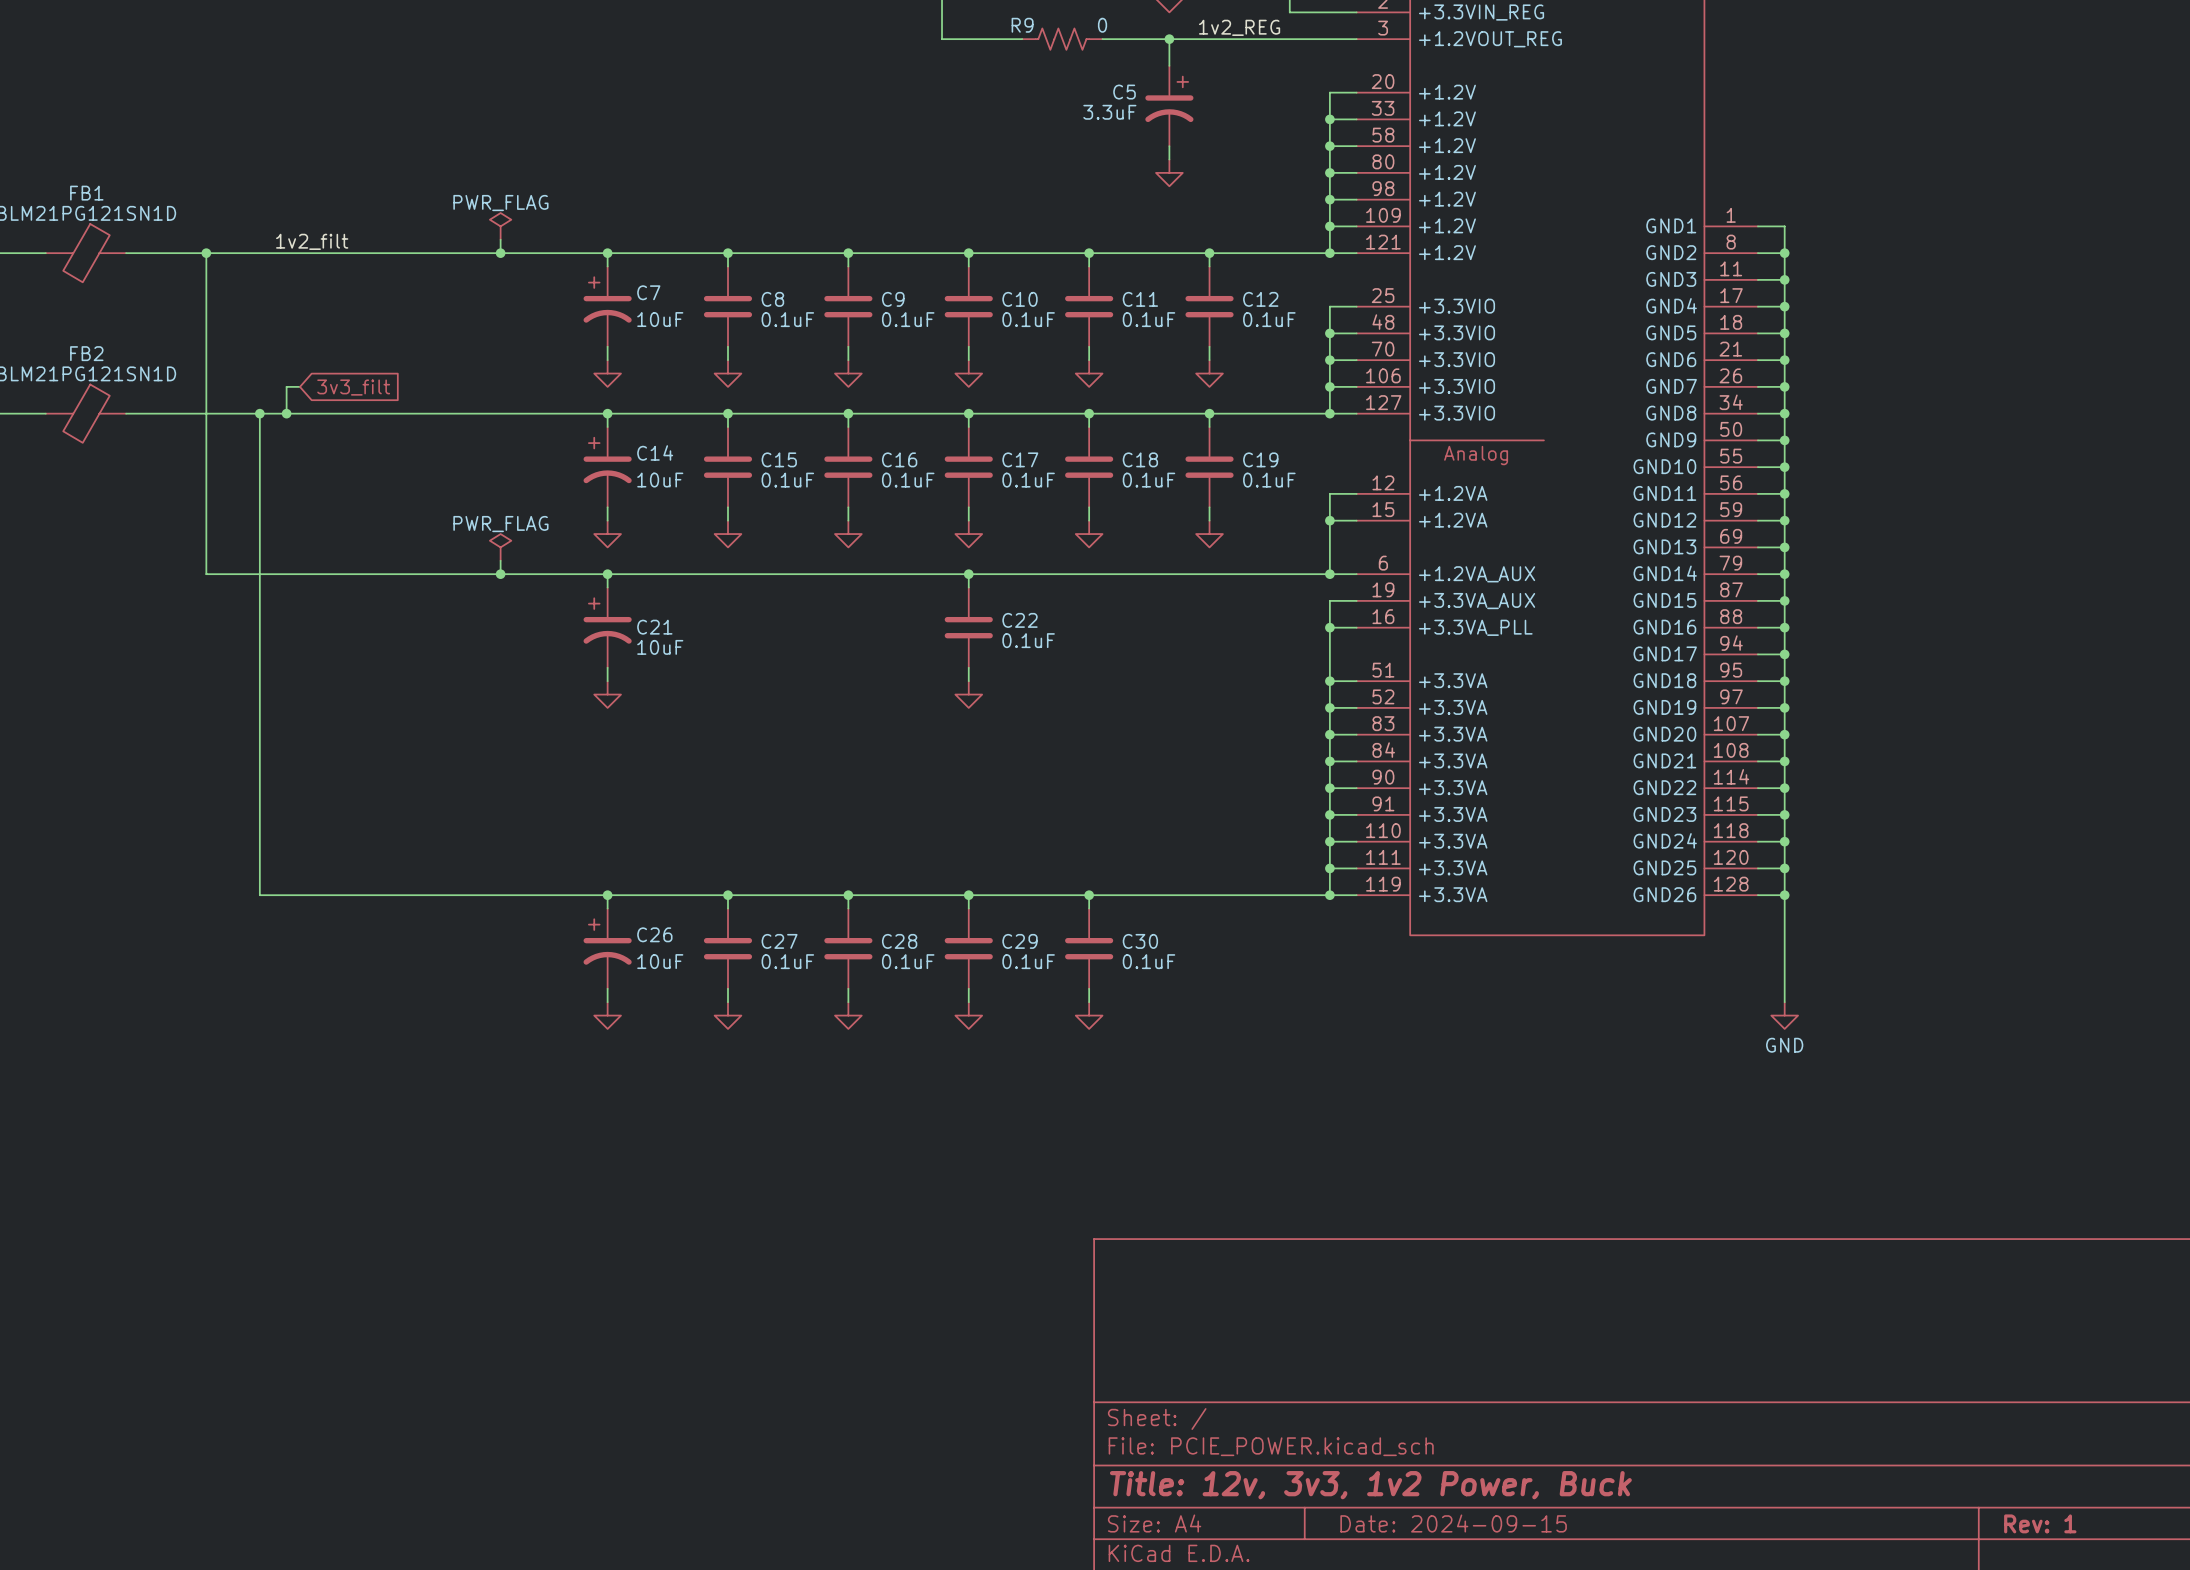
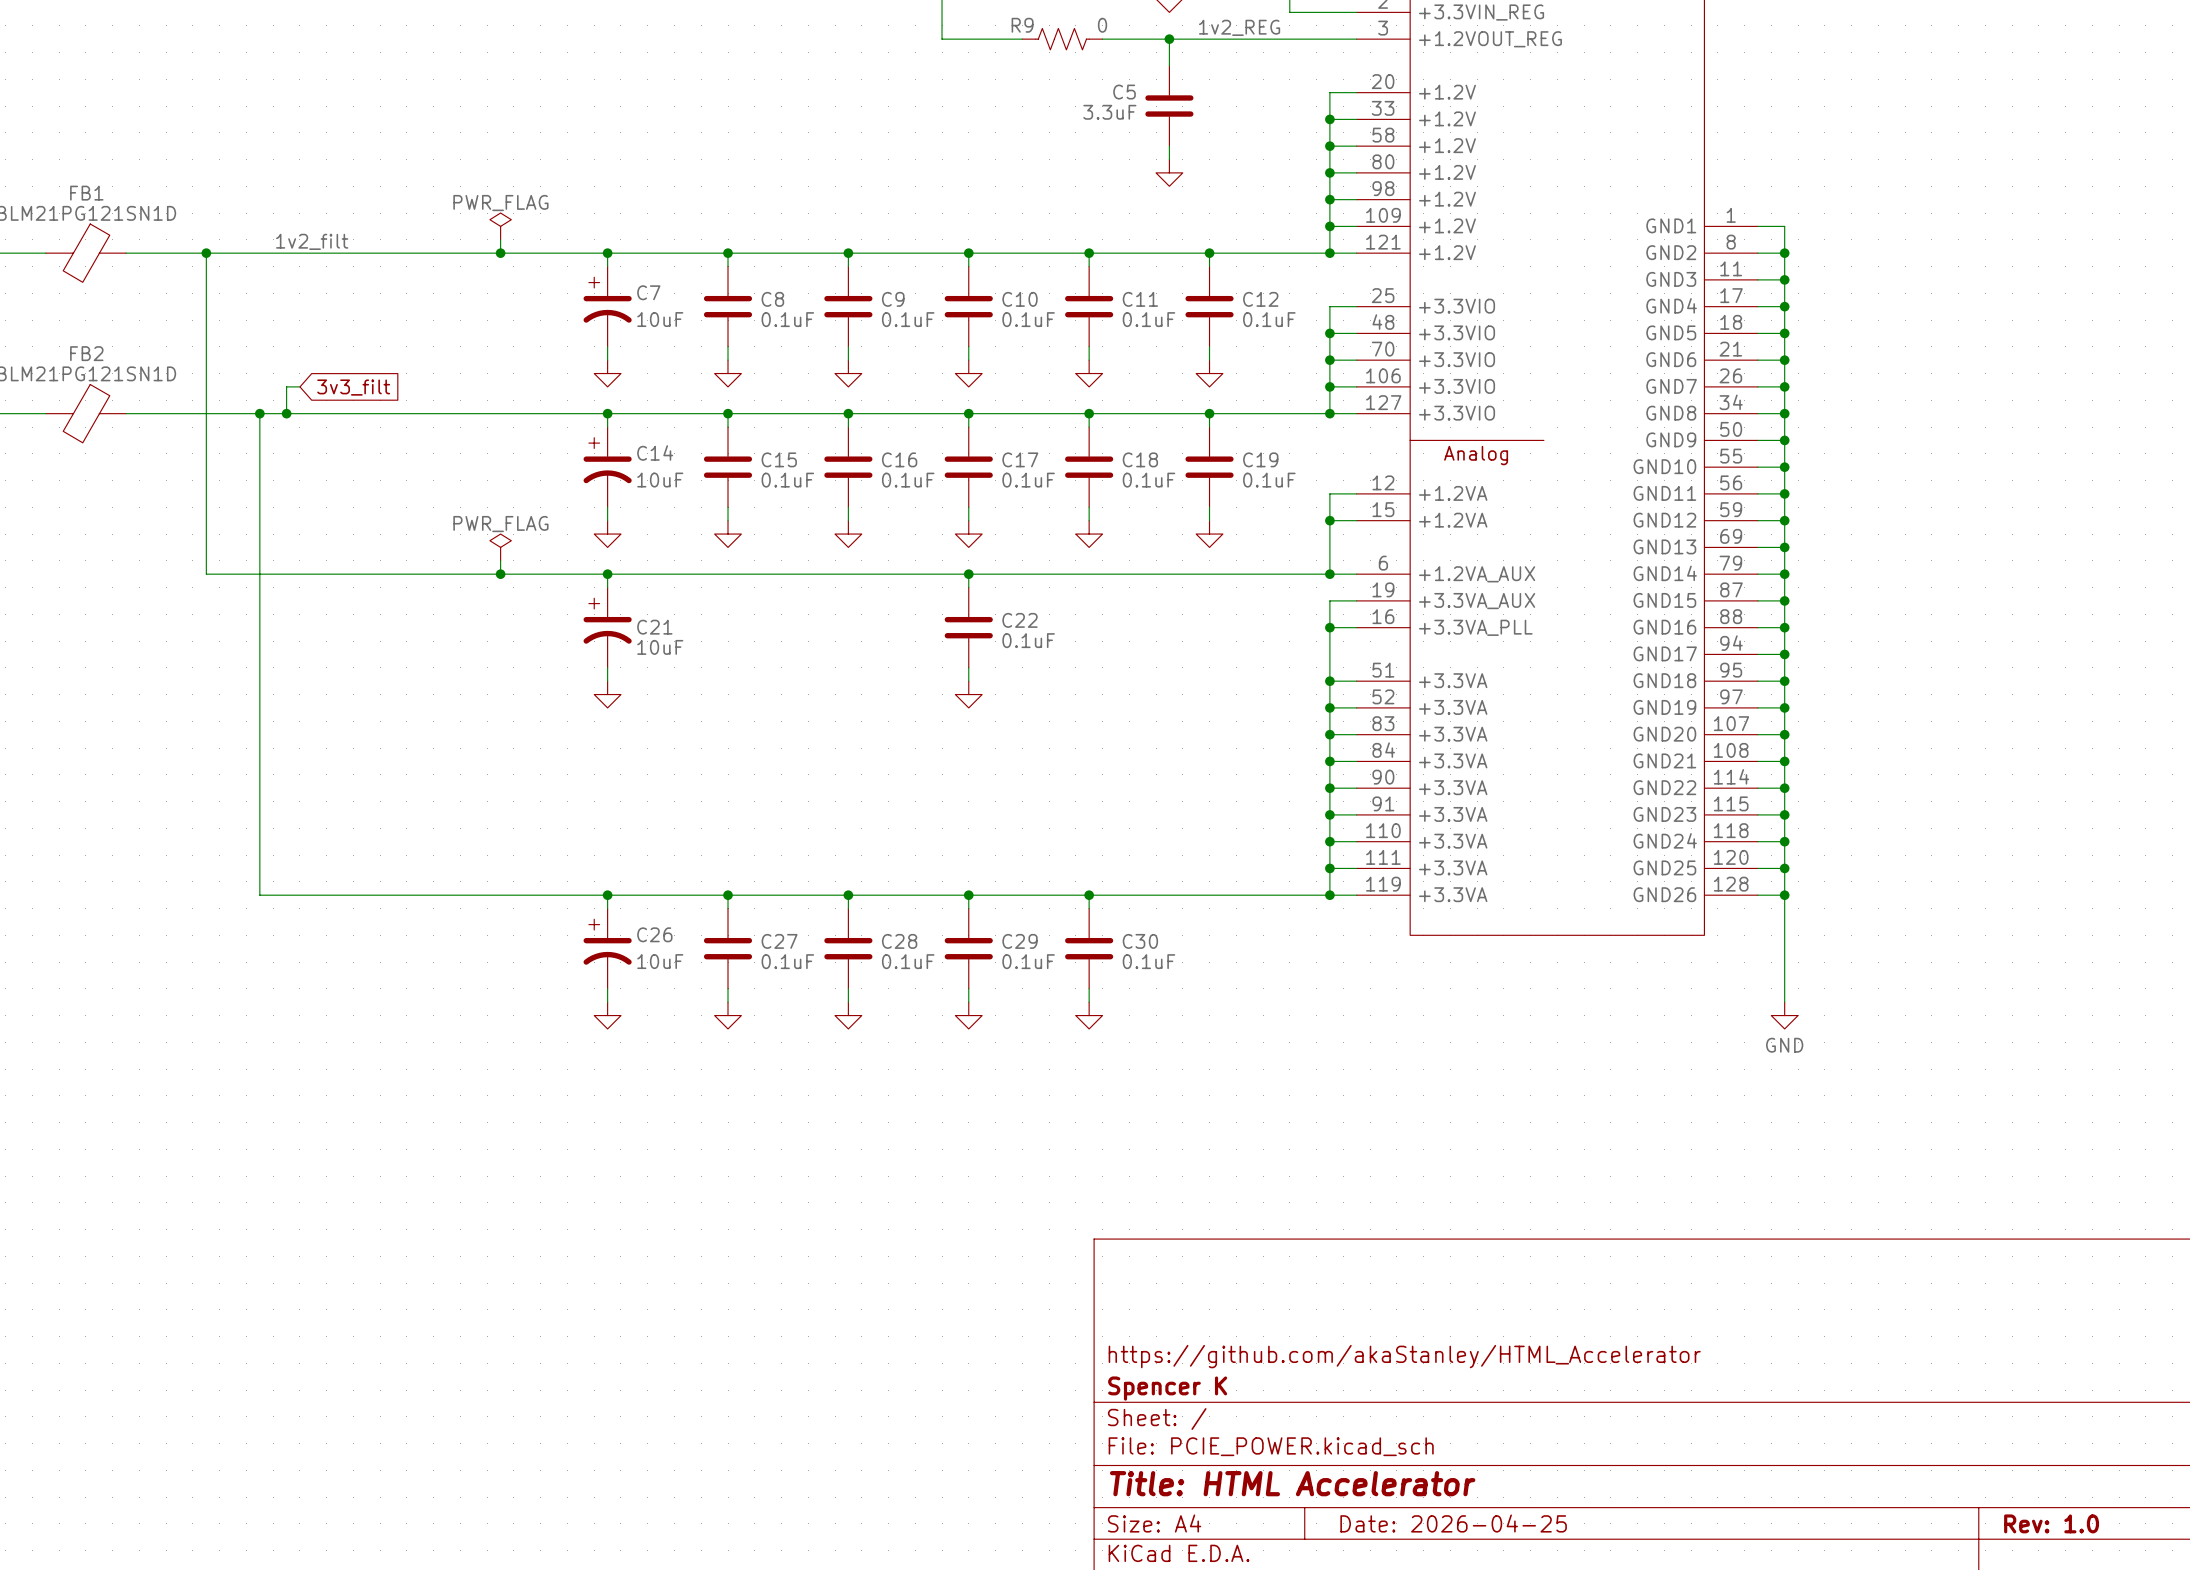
C5 symbol: [1145, 65, 1194, 147] -> [1145, 65, 1194, 147]
title block: none -> https://github.com/akaStanley/HTML_Accelerator (1404, 1356)
title block: none -> Spencer K (1167, 1388)
title block: Title: 12v, 3v3, 1v2 Power, Buck (1370, 1485) -> Title: HTML Accelerator (1292, 1483)
title block: Date: 2024-09-15 (1453, 1523) -> Date: 2026-04-25 (1453, 1523)
title block: Rev: 1 (2040, 1523) -> Rev: 1.0 (2051, 1523)

